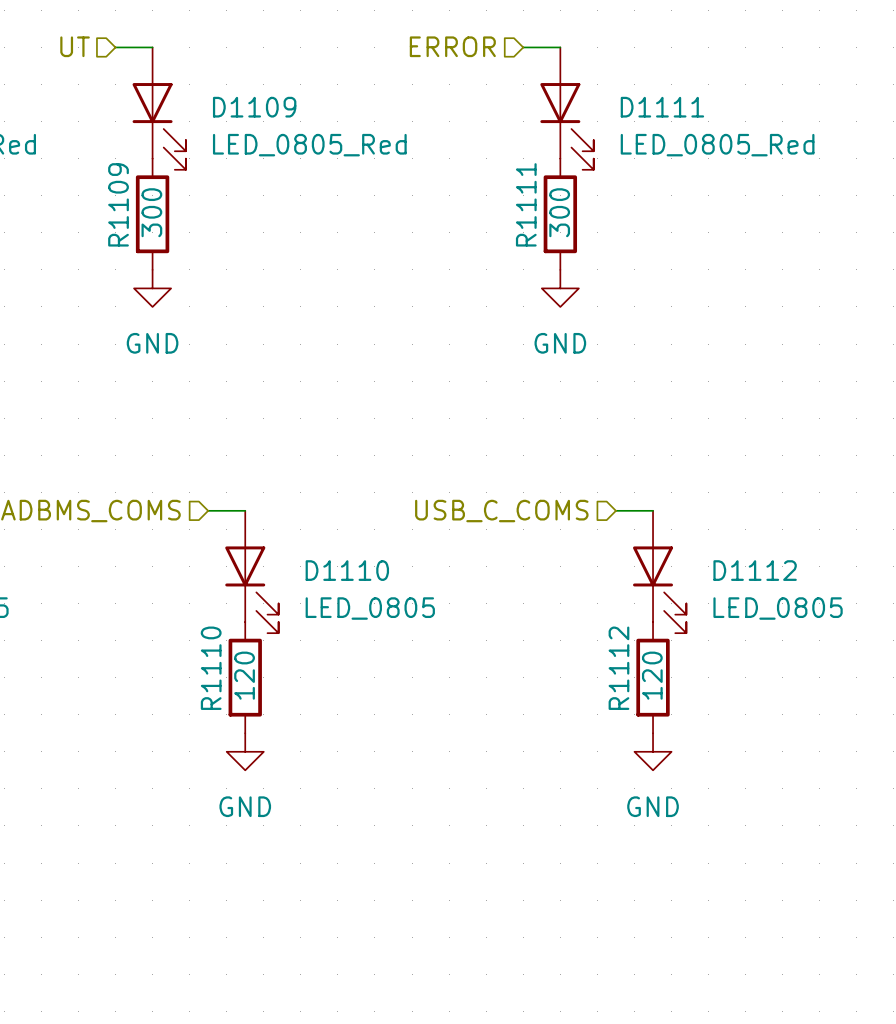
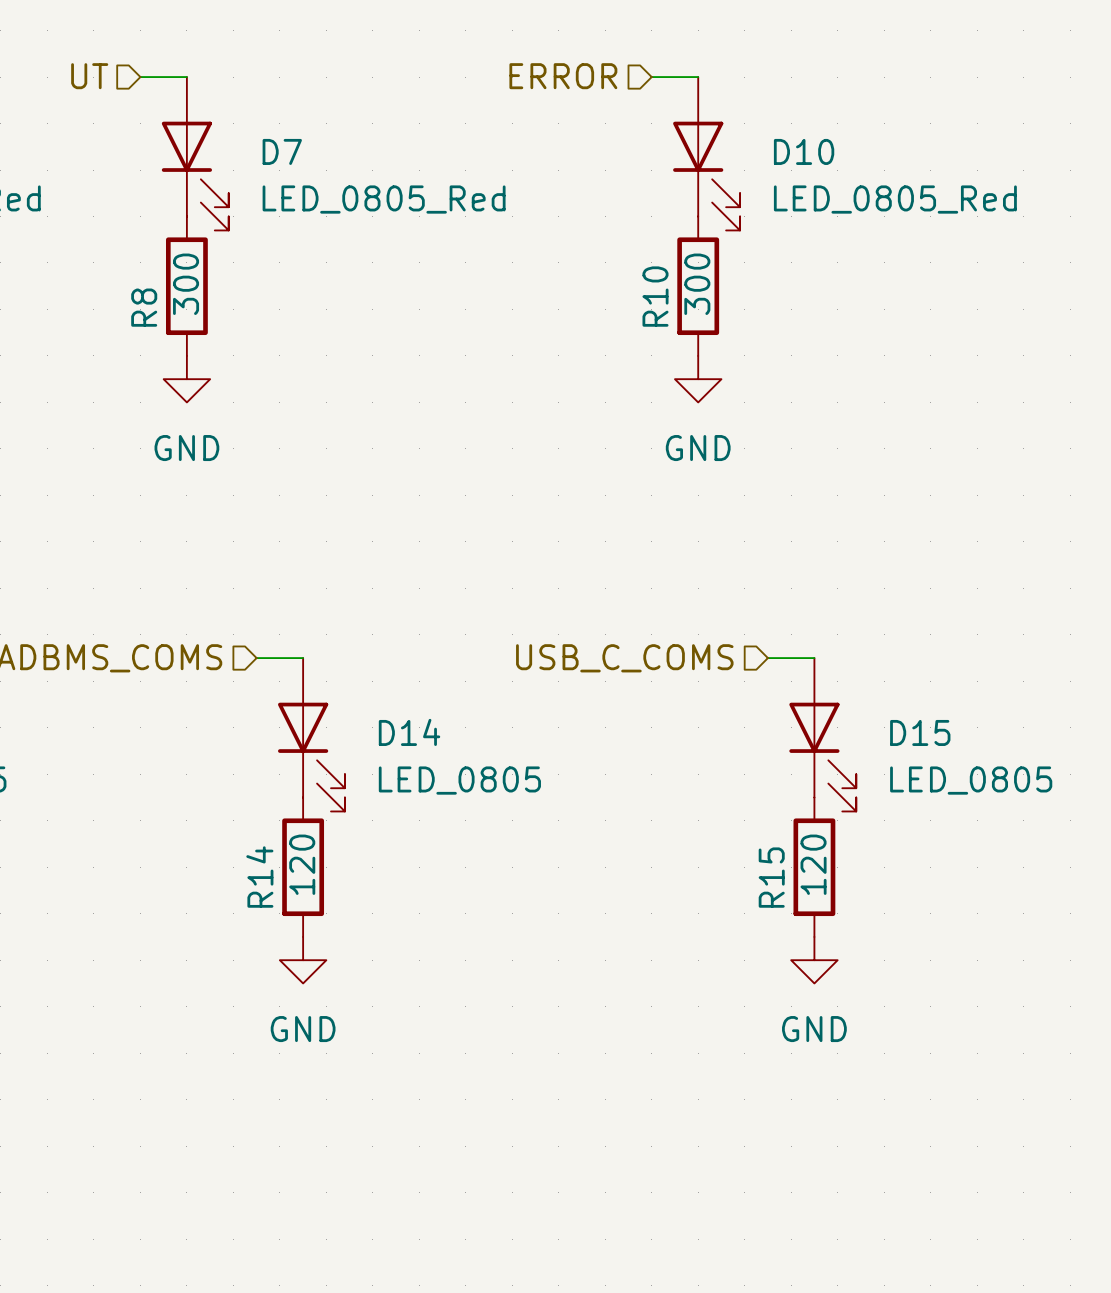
D1109 name: D1109 (254, 107) -> D7 (282, 151)
D1111 name: D1111 (662, 107) -> D10 (804, 151)
R1109 name: R1109 (118, 204) -> R8 (144, 307)
R1111 name: R1111 (526, 204) -> R10 (655, 296)
D1110 name: D1110 (347, 570) -> D14 (409, 732)
D1112 name: D1112 (755, 570) -> D15 (920, 732)
R1110 name: R1110 (211, 668) -> R14 (259, 877)
R1112 name: R1112 (618, 668) -> R15 (771, 877)

